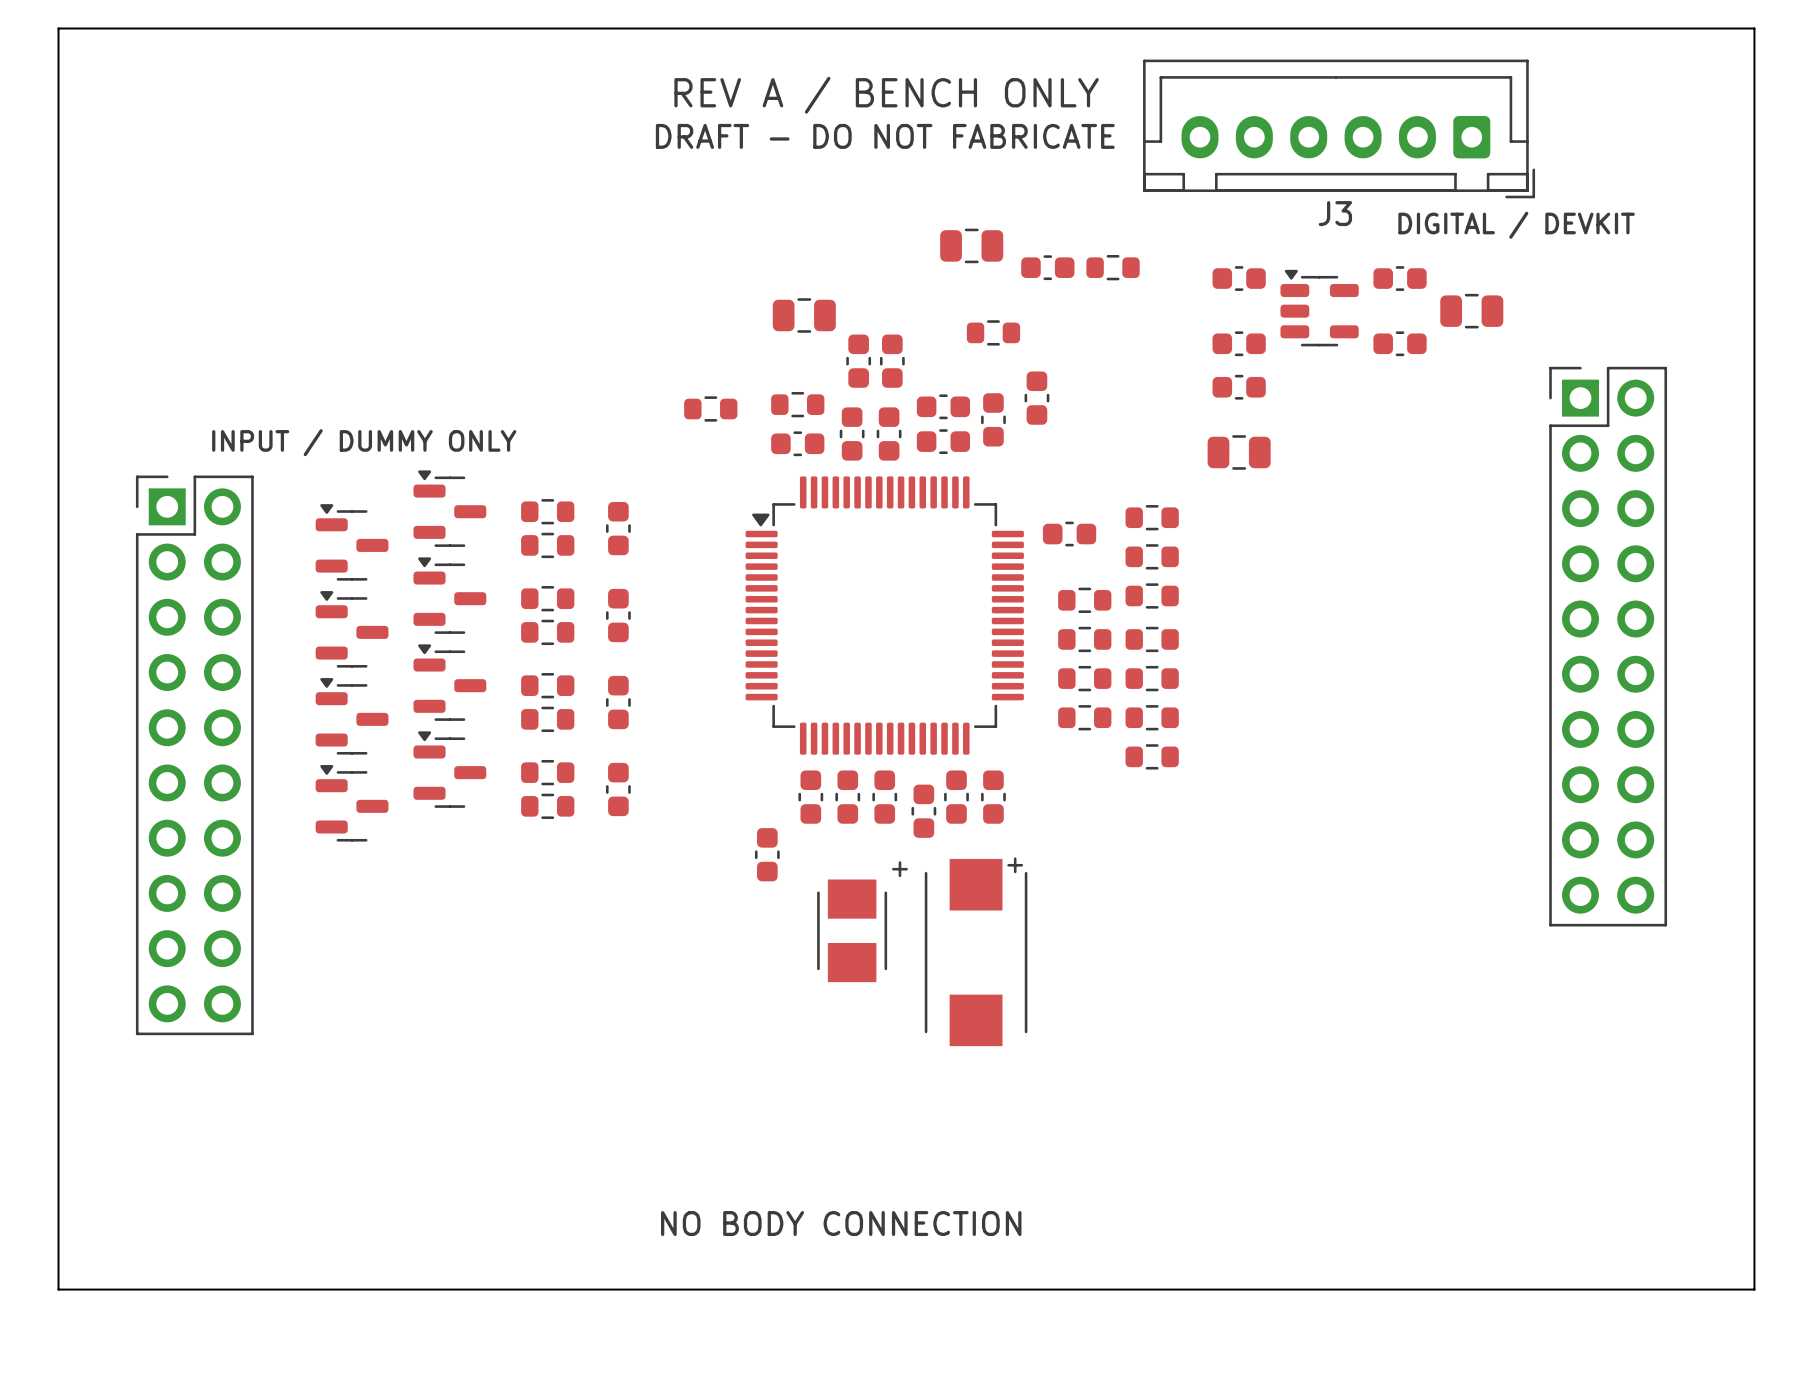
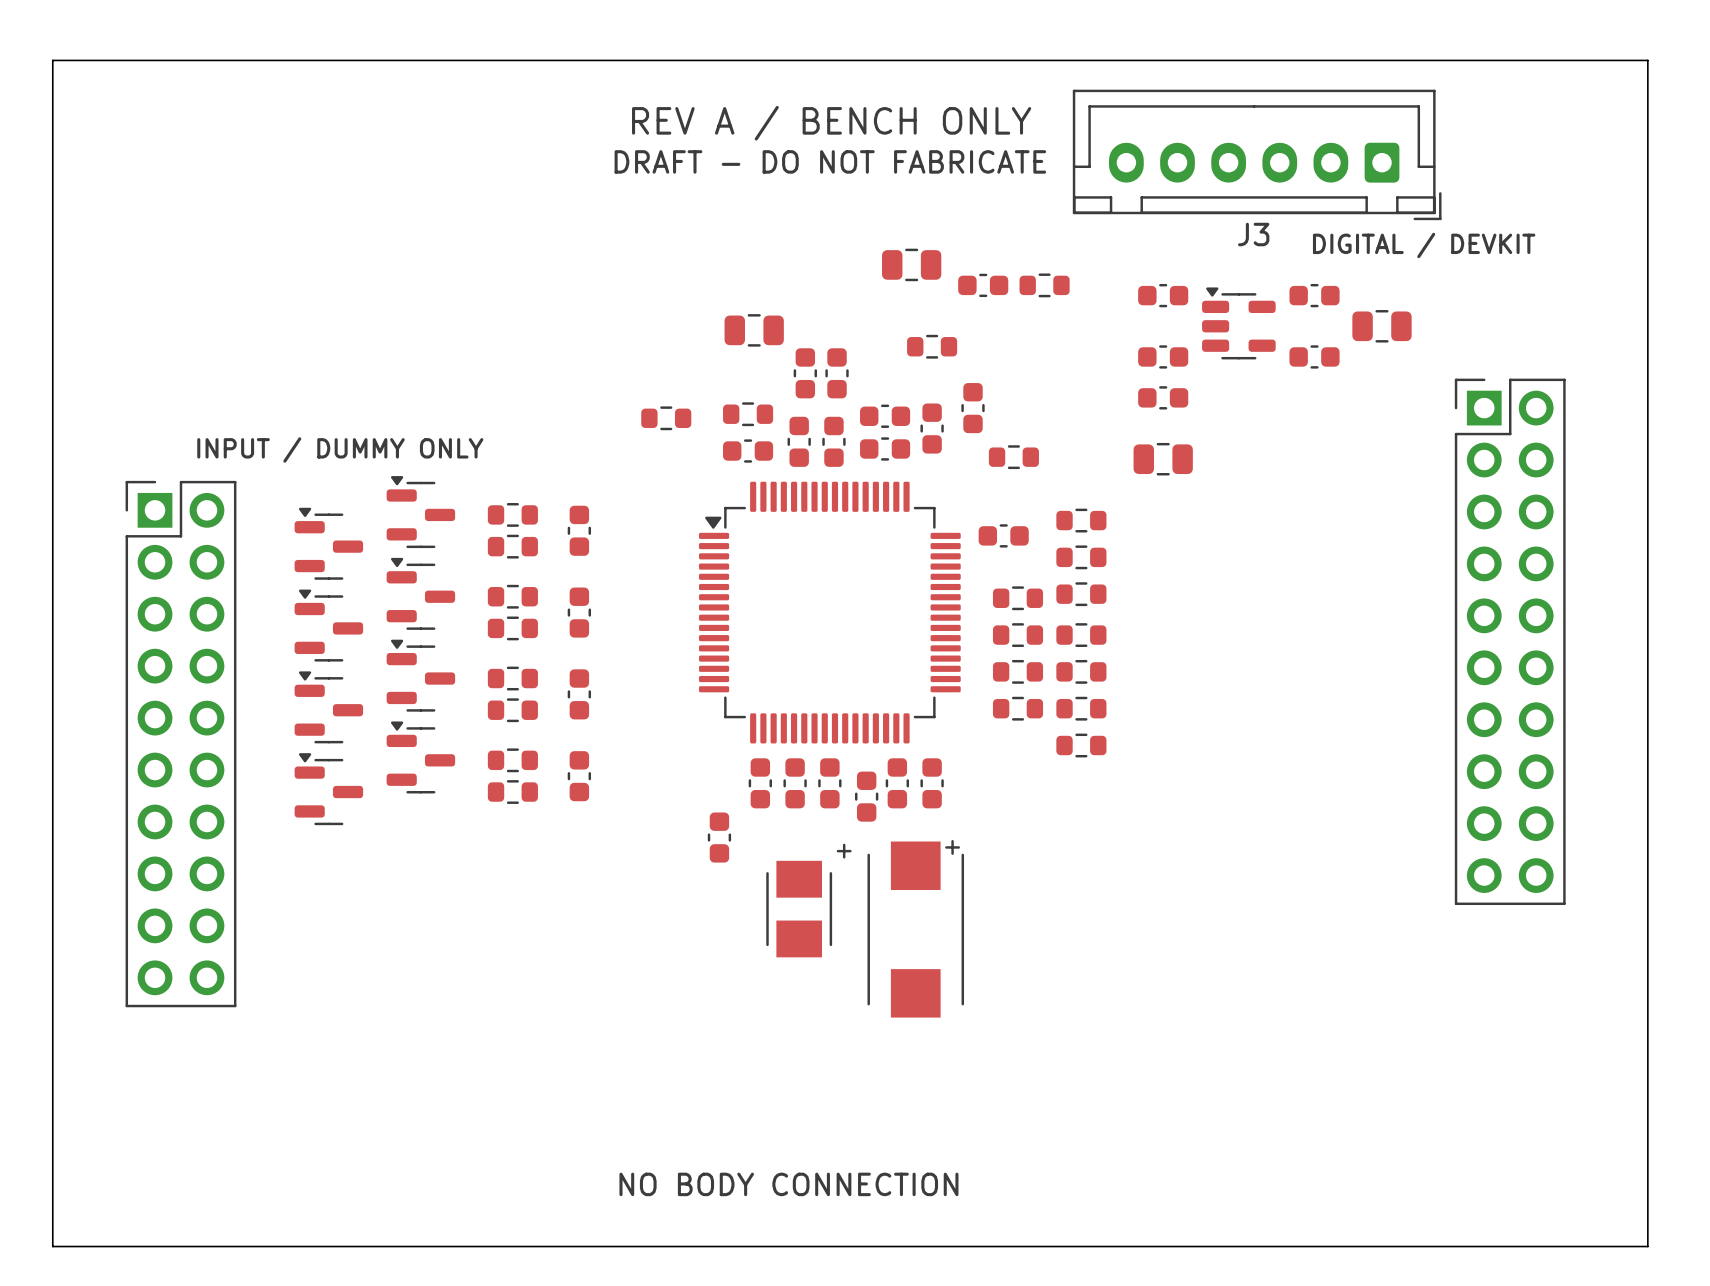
part: none -> (1013, 457)

